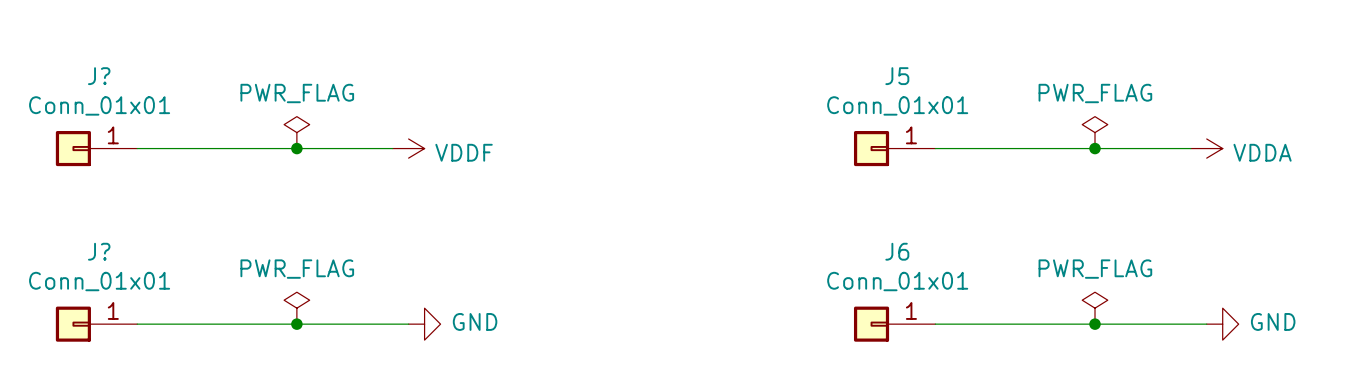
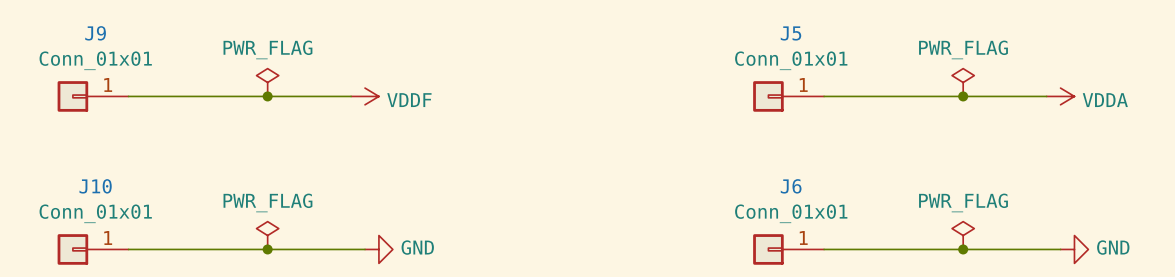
J? name: J? (99, 76) -> J9 (95, 33)
J? name: J? (99, 251) -> J10 (95, 186)

